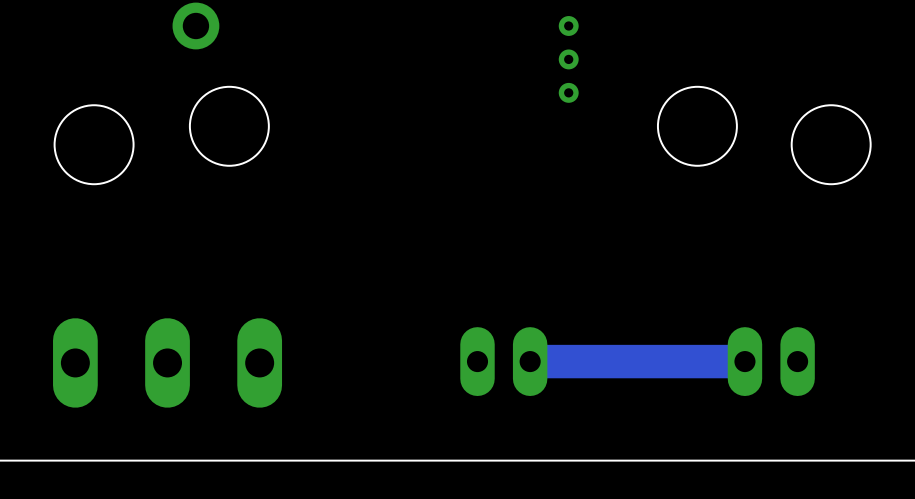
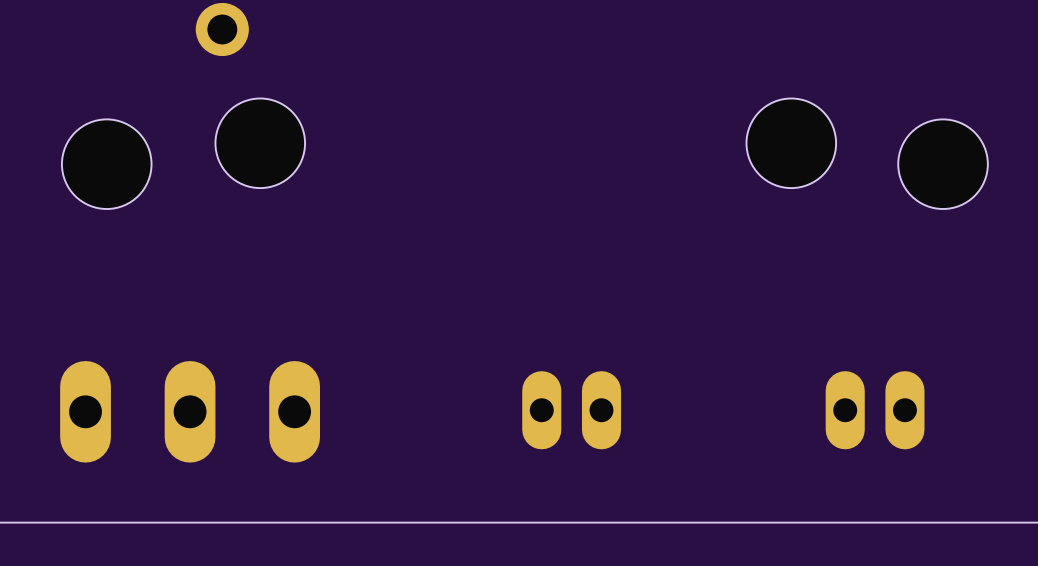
via: (568, 26) -> none
via: (568, 59) -> none
via: (568, 92) -> none
track: (744, 361) (530, 361) -> none

